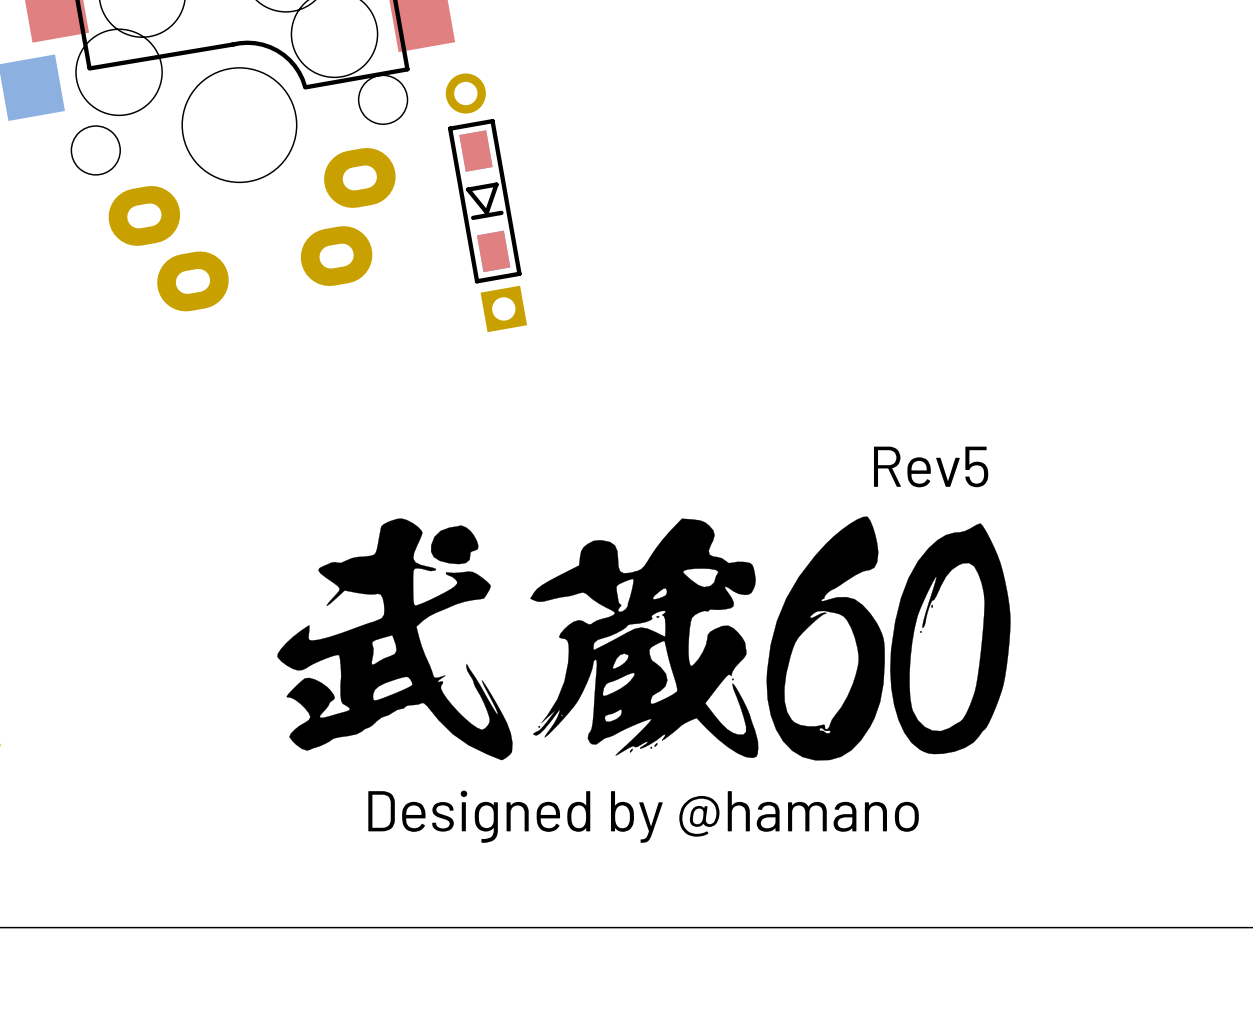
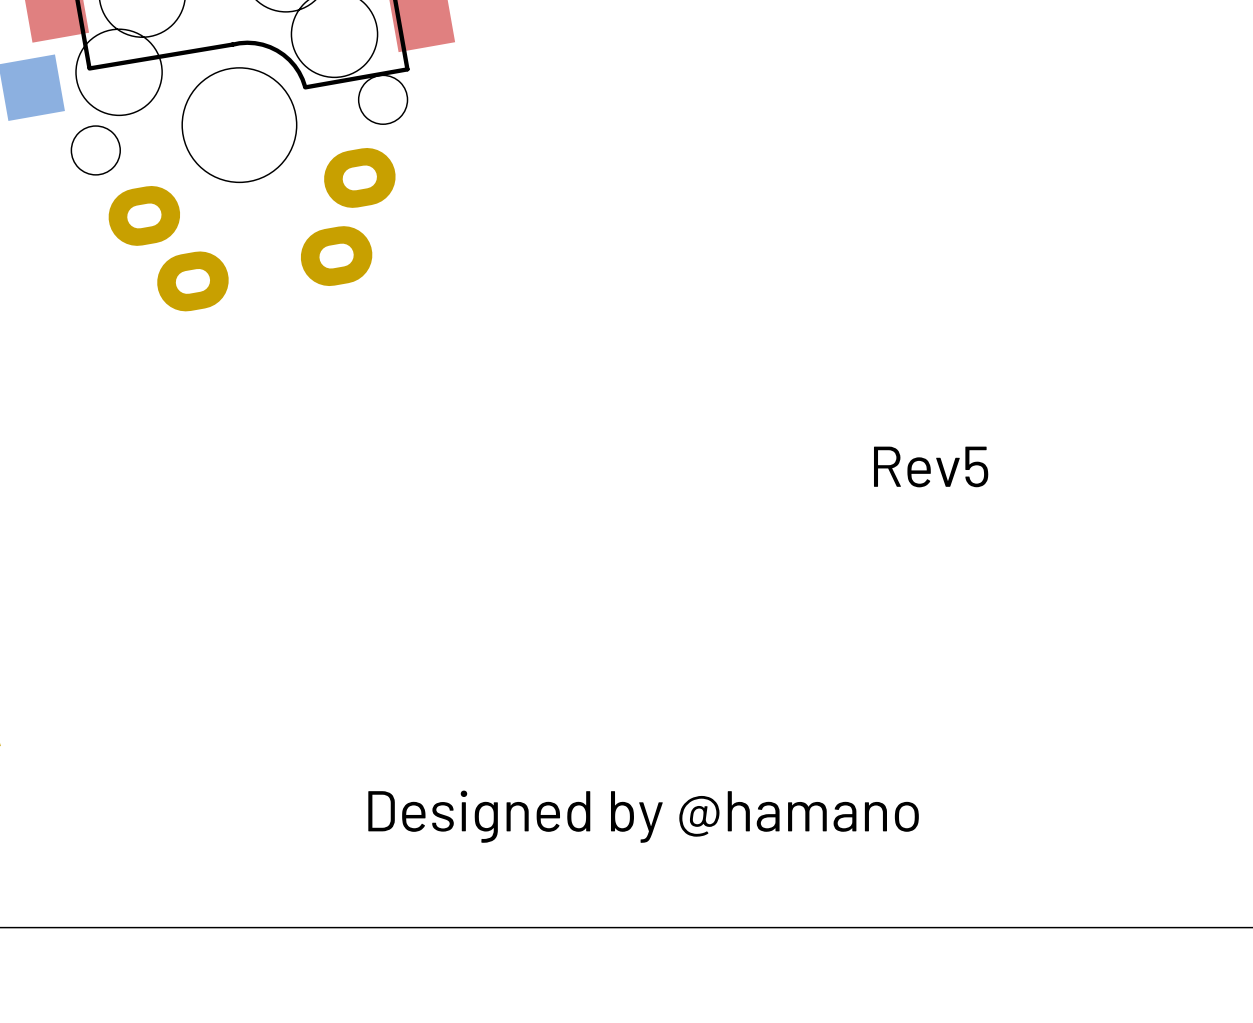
part: (486, 202) -> none
drawing: [277, 516, 1011, 761] -> none

